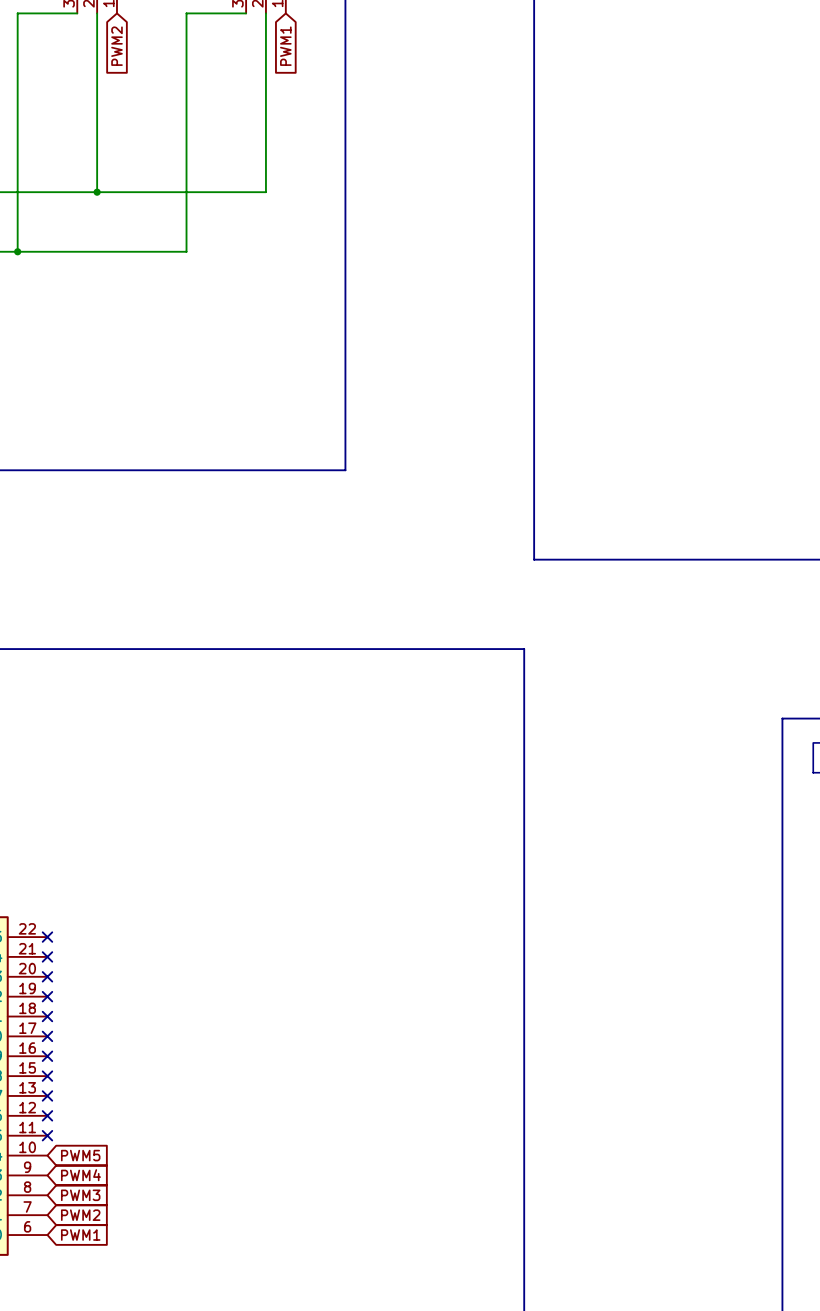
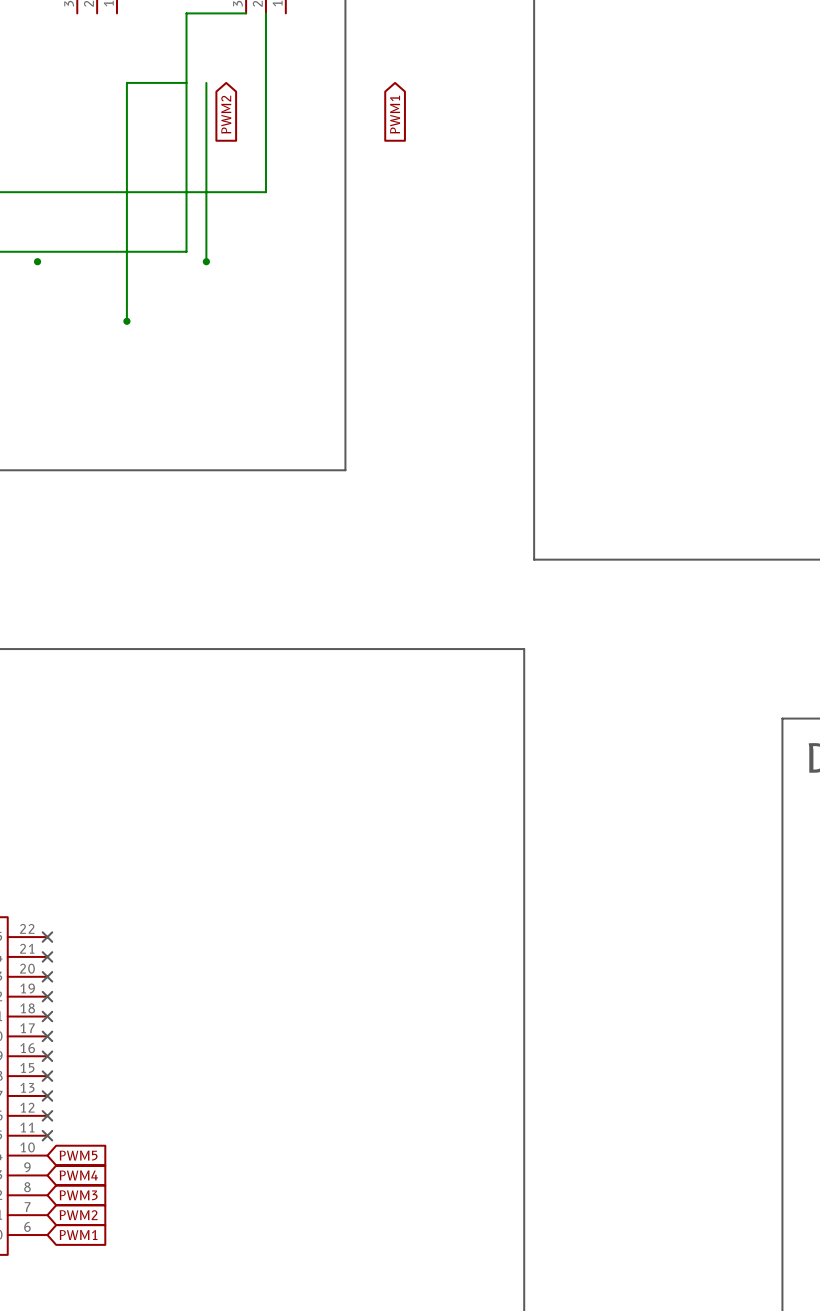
wire: (77, 13) (17, 13) (17, 251) -> (186, 82) (126, 82) (126, 321)
wire: (97, 13) (97, 192) -> (206, 82) (206, 261)
global label position: PWM2 (116, 46) -> PWM2 (226, 114)
global label position: PWM1 (285, 46) -> PWM1 (395, 114)
junction: (97, 192) -> none
junction position: (17, 251) -> (37, 261)
junction: none -> (206, 261)
junction: none -> (126, 321)

